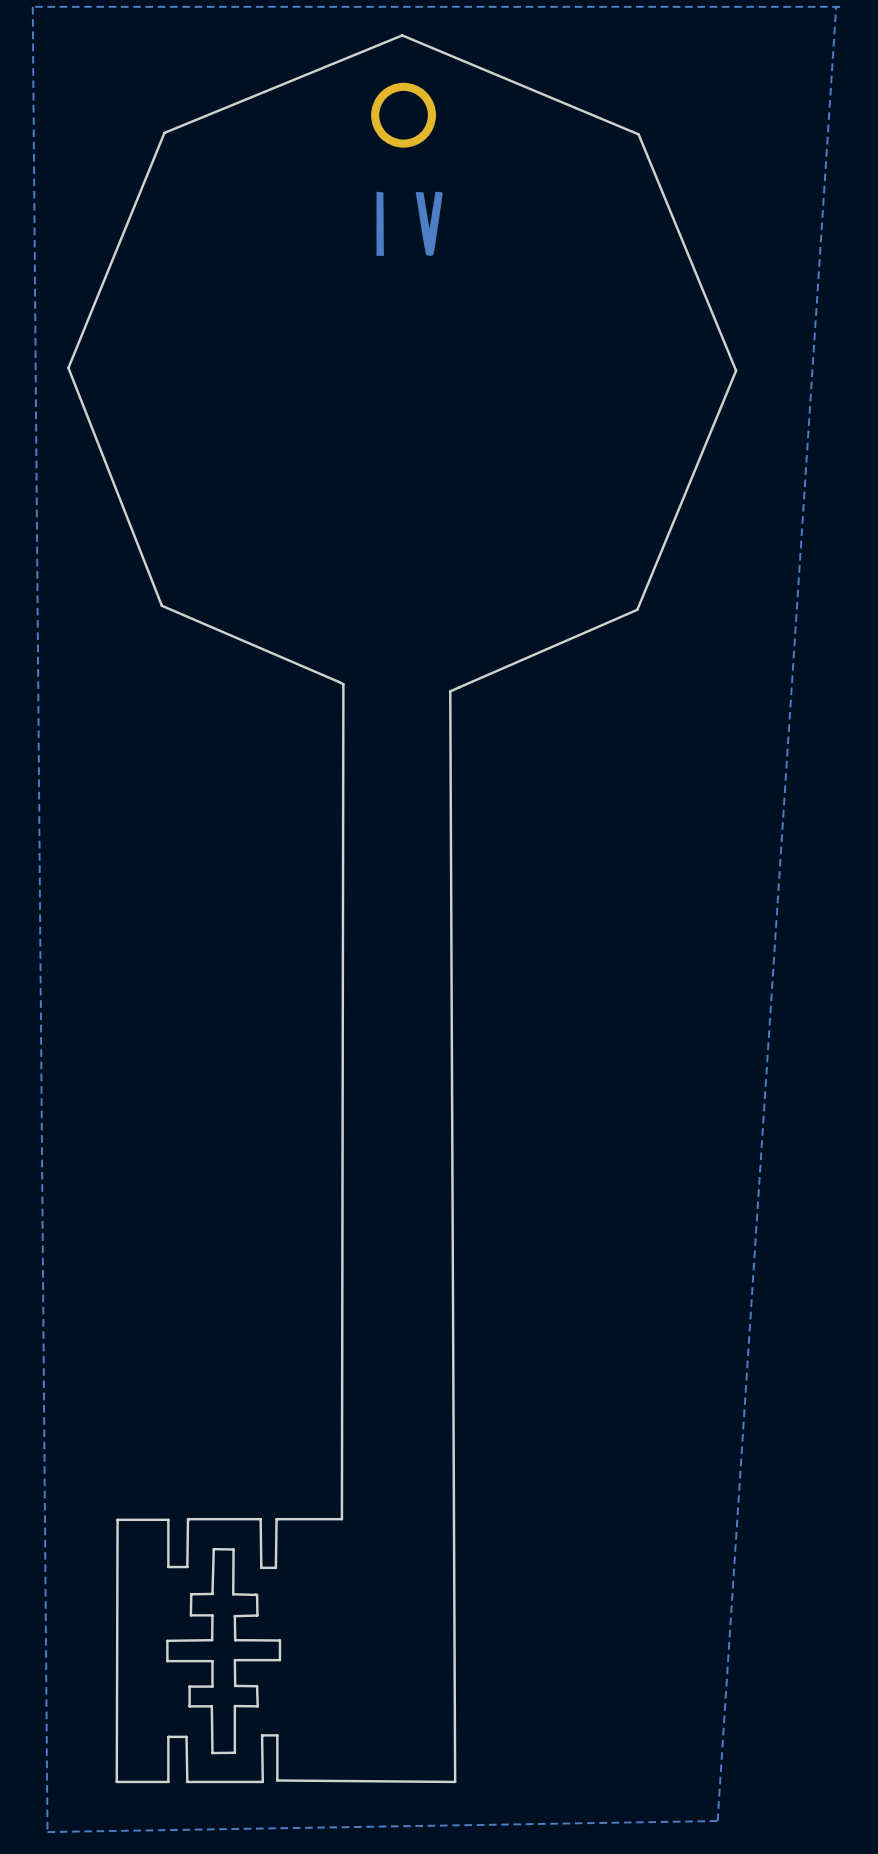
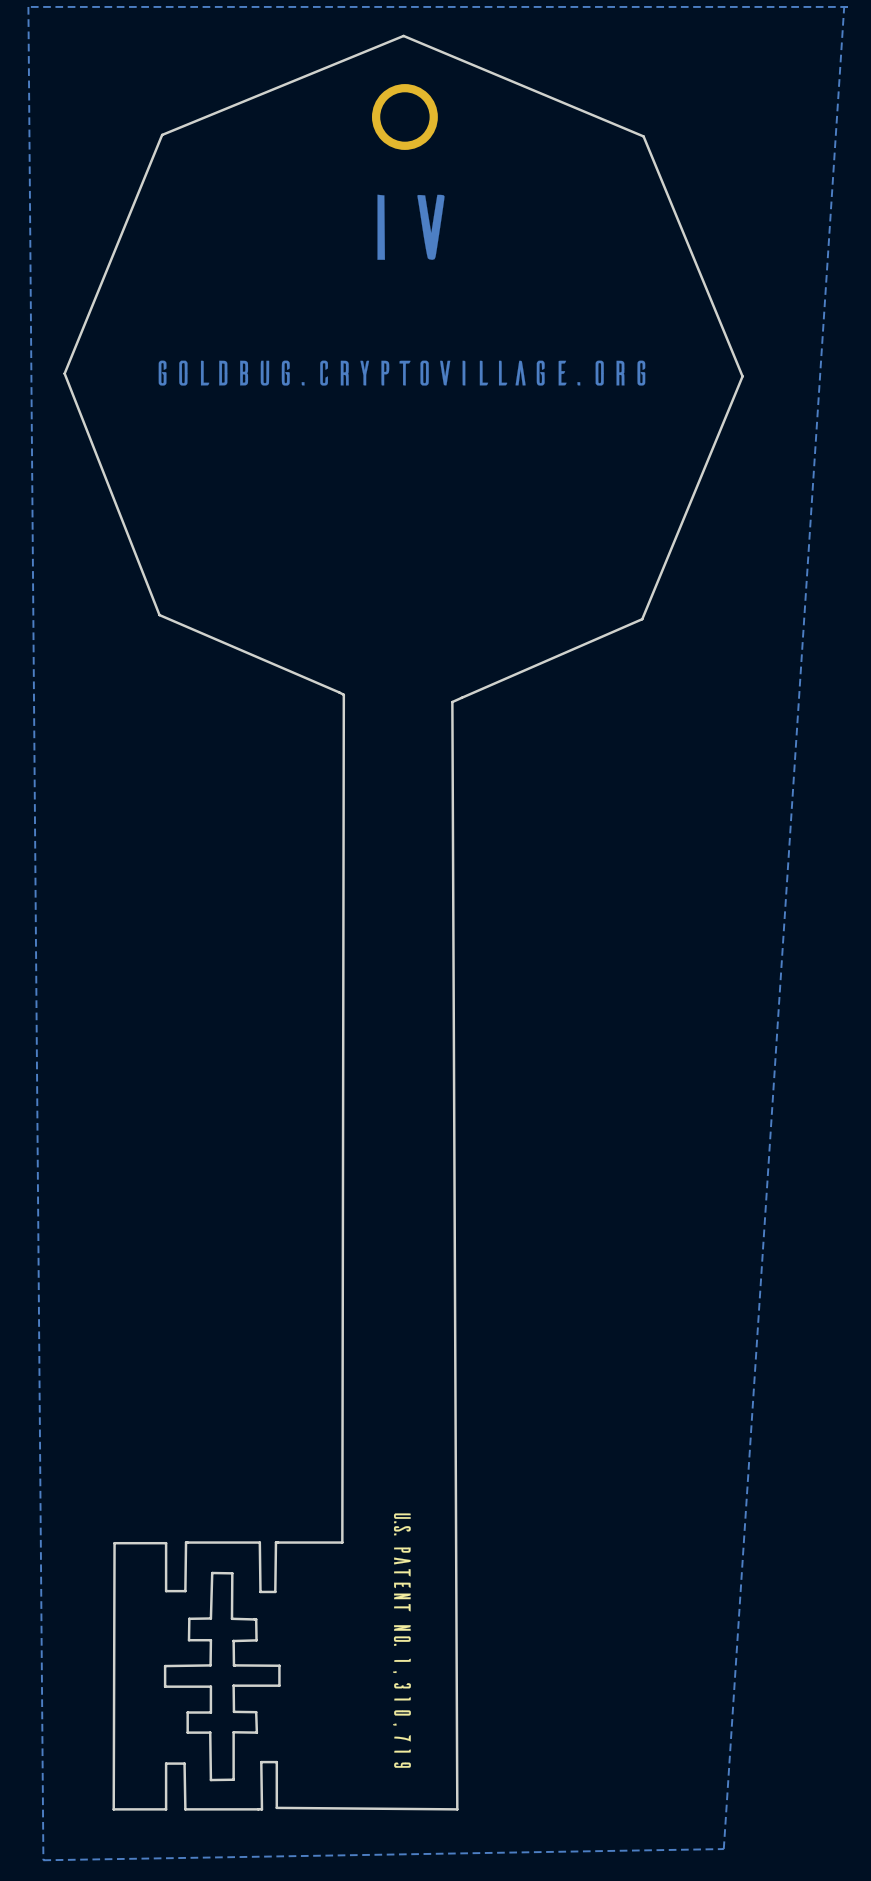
drawing: none -> [158, 360, 646, 386]
drawing: none -> [393, 1513, 411, 1768]

